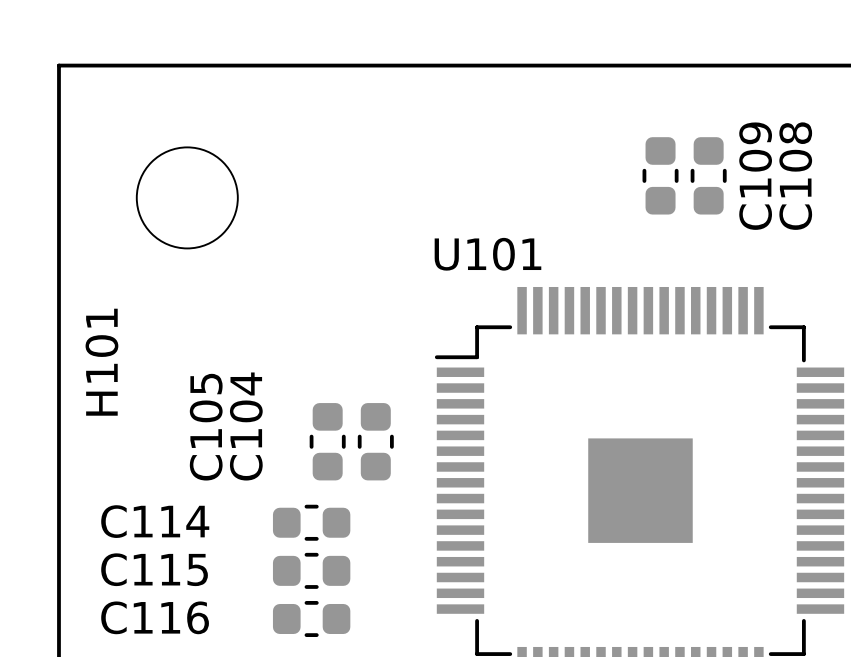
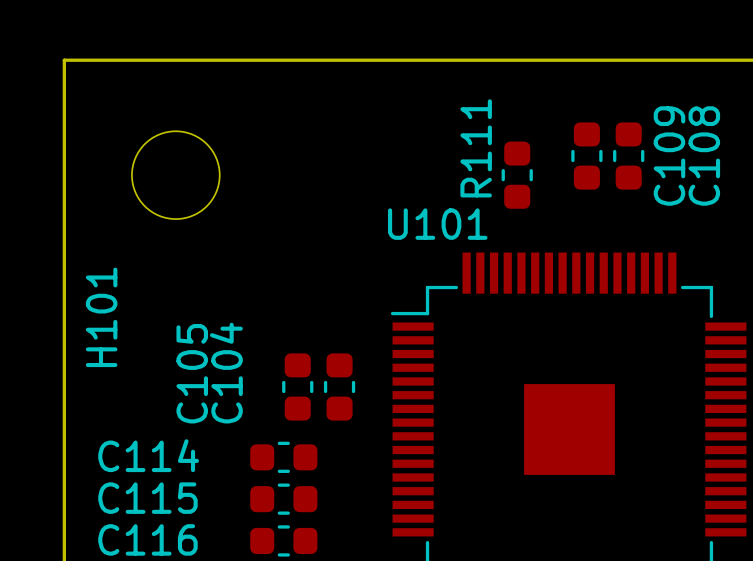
R111: none -> (517, 175)

